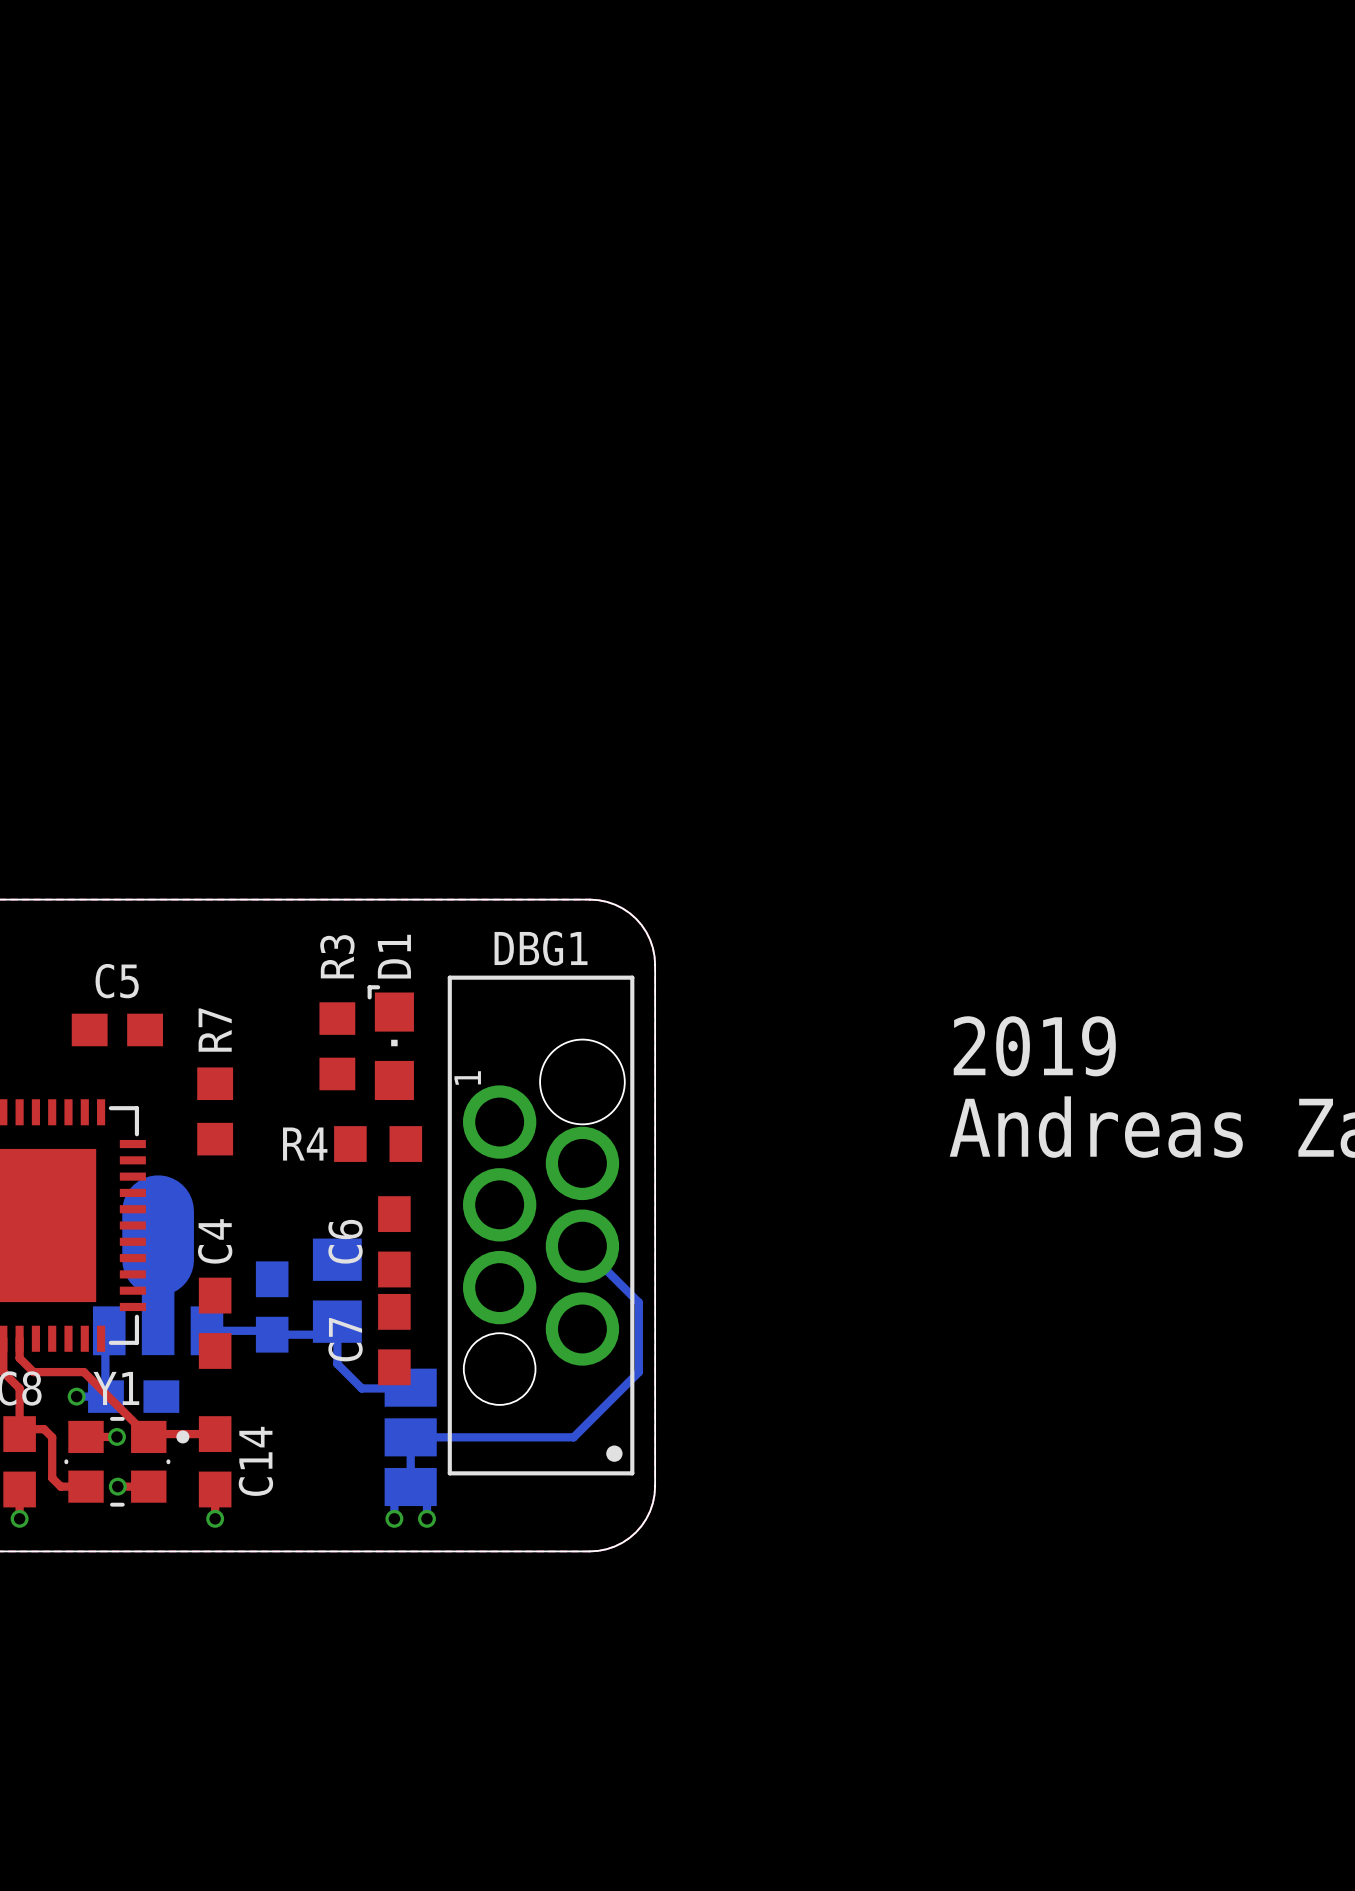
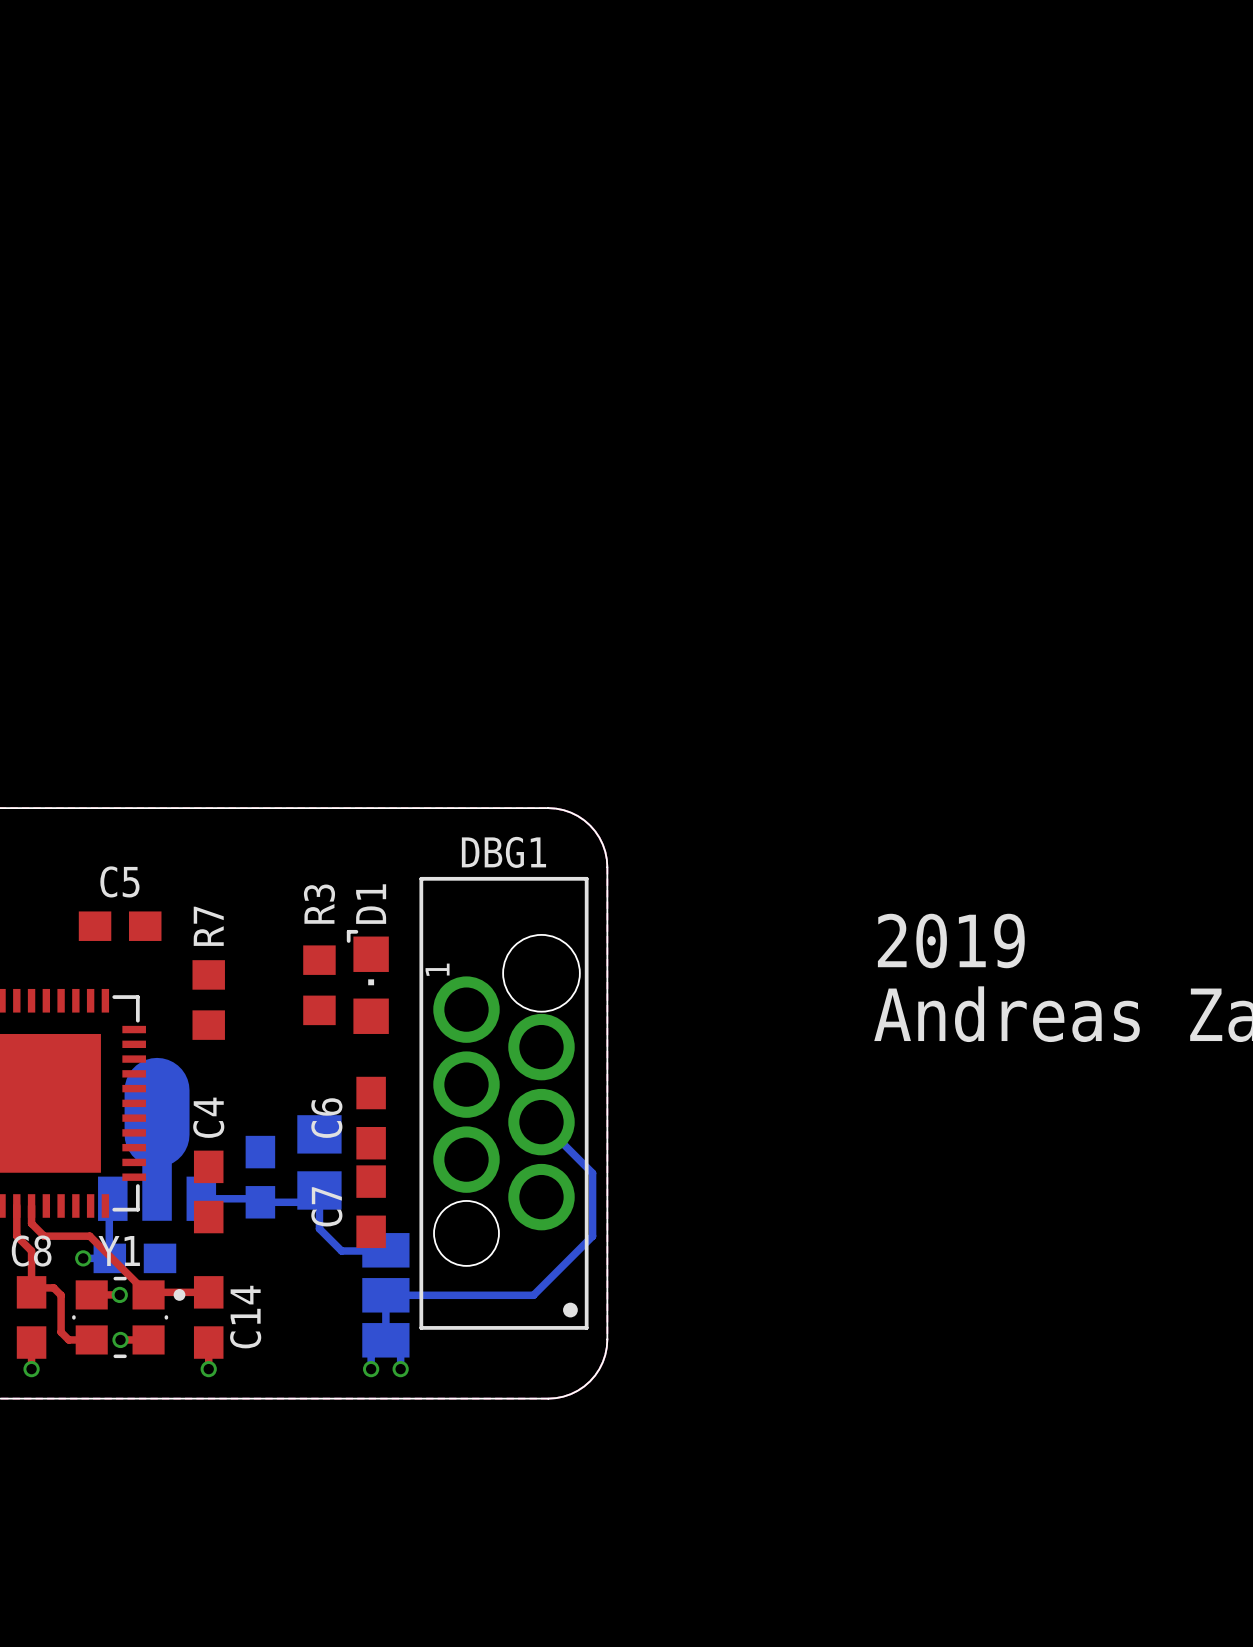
D1 position: (390, 1042) -> (367, 981)
R3 position: (337, 1046) -> (319, 985)
R4: (378, 1144) -> none

